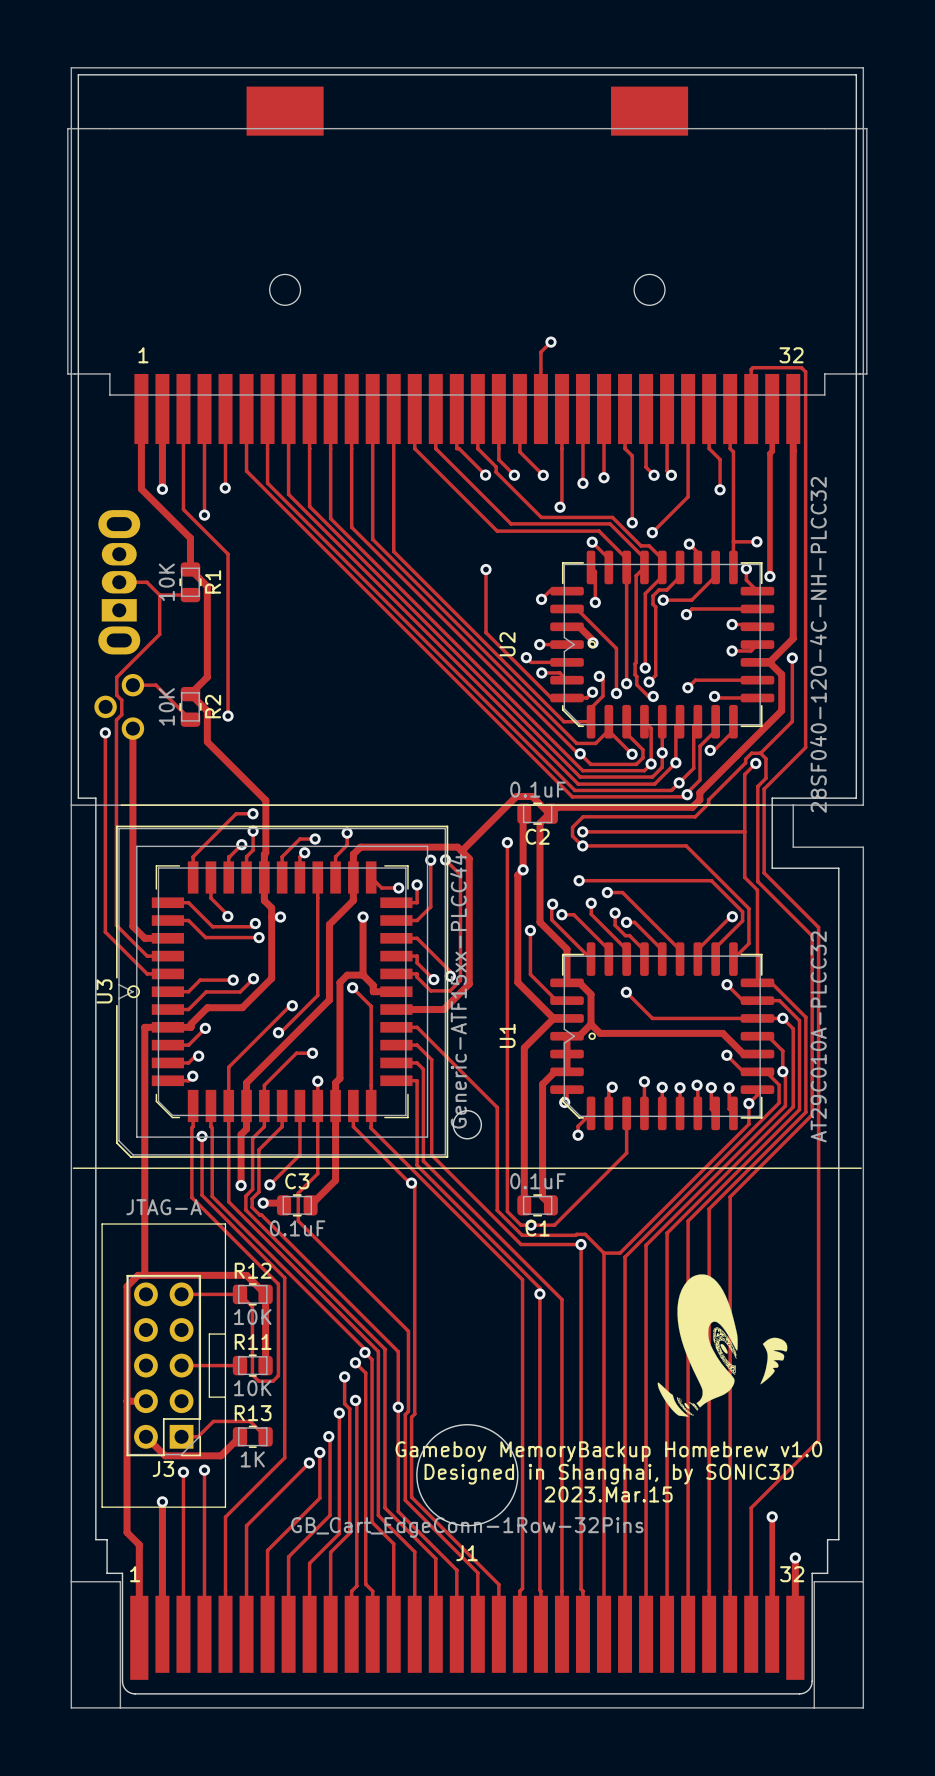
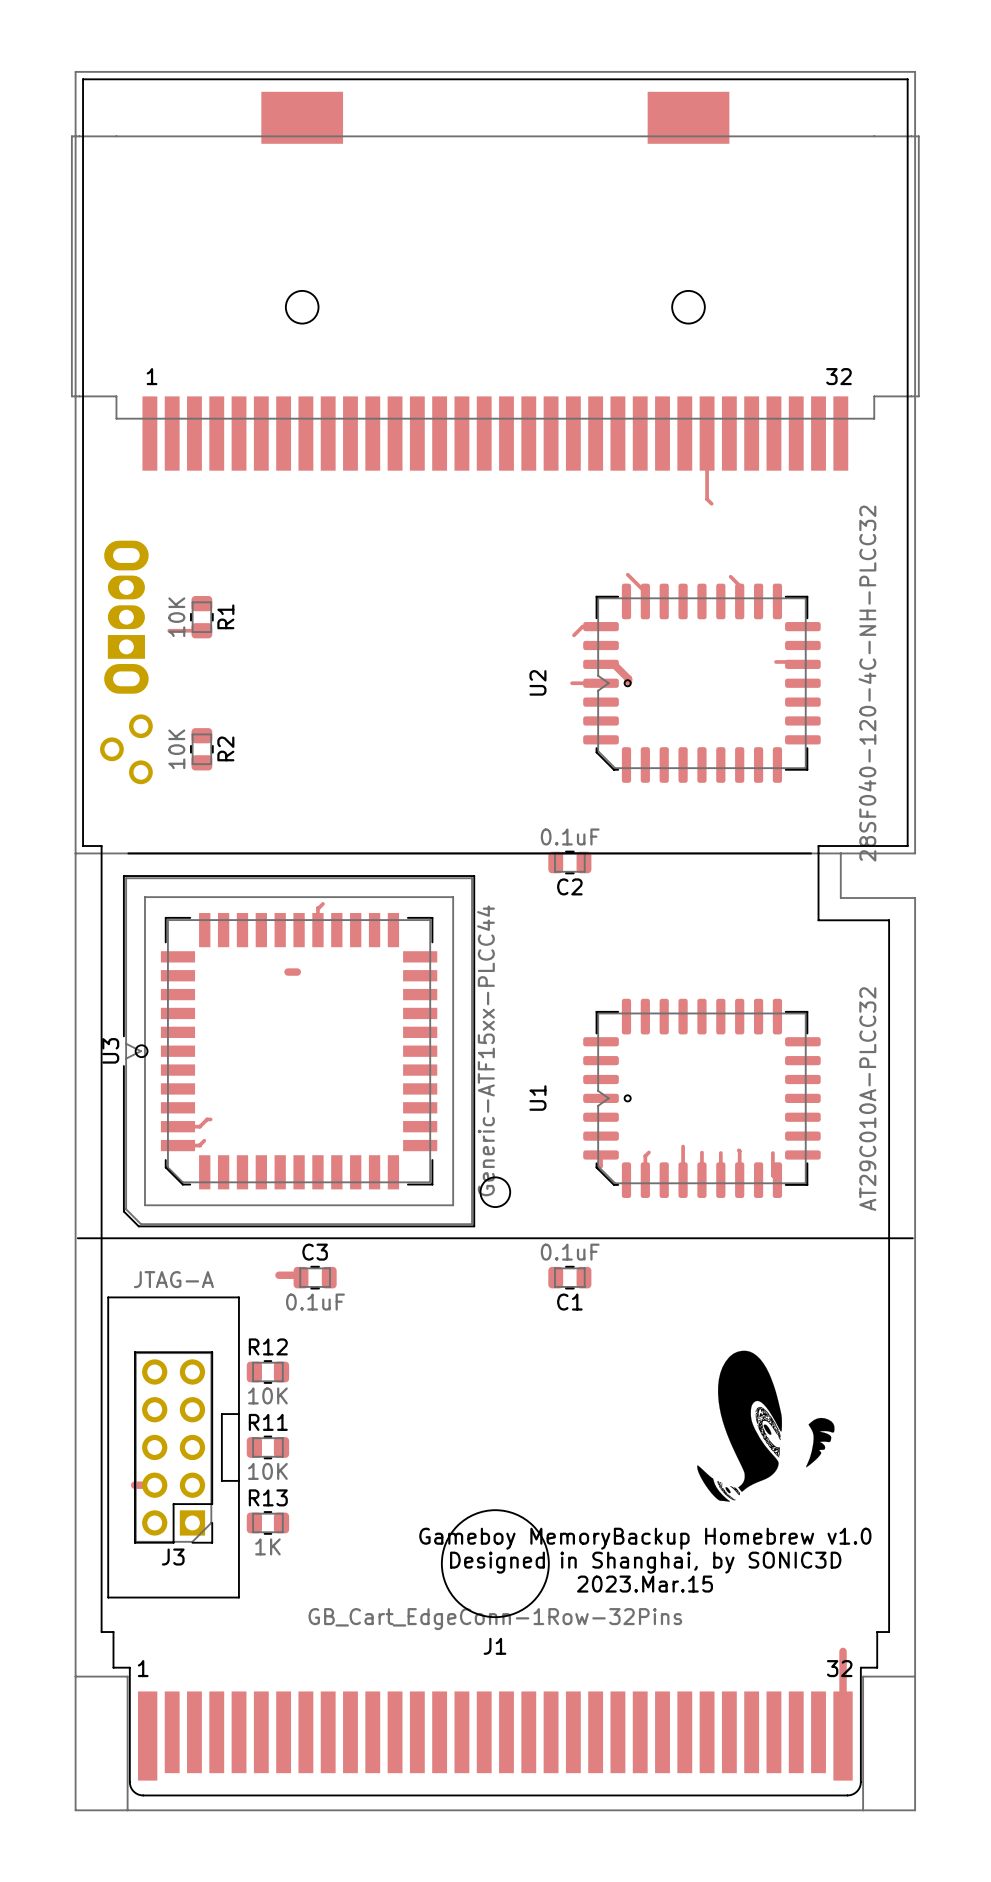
track: (550, 342) (540, 352) (540, 409) -> none
via: (550, 342) -> none
track: (141, 409) (141, 489) (190, 538) (190, 569) (207, 586) (207, 677) (190, 694) (207, 710) (207, 741) (265, 800) (264, 900) (271, 907) (271, 978) (242, 1007) (207, 1007) (191, 1024) (191, 1027) (144, 1027) (144, 1275) -> none
track: (162, 409) (162, 489) -> none
track: (183, 409) (183, 509) (228, 554) (228, 716) -> none
track: (204, 409) (204, 515) -> none
track: (225, 409) (225, 488) -> none
track: (246, 409) (246, 471) (572, 796) (683, 796) (700, 780) (700, 746) (715, 730) (715, 721) -> none
track: (267, 409) (267, 483) (574, 790) (671, 790) (693, 768) (693, 725) (697, 721) -> none
track: (288, 409) (288, 494) (578, 784) (654, 784) (675, 762) (675, 725) (680, 721) -> none
track: (309, 409) (309, 506) (580, 777) (652, 777) (662, 767) (662, 721) -> none
track: (330, 409) (330, 518) (582, 770) (644, 770) (651, 763) (651, 728) (644, 721) -> none
track: (351, 409) (351, 527) (590, 764) (636, 764) (642, 757) (642, 749) (626, 733) (626, 721) -> none
track: (372, 409) (372, 539) (576, 743) (595, 743) (608, 730) (608, 721) -> none
track: (393, 409) (393, 551) (563, 721) (591, 721) (591, 708) (603, 696) (603, 680) (599, 676) -> none
track: (414, 409) (414, 448) (497, 531) (599, 531) (626, 558) (626, 683) -> none
track: (435, 409) (435, 448) (511, 523) (610, 523) (644, 558) (644, 567) (636, 575) (635, 674) (636, 684) (648, 696) (653, 696) -> none
track: (456, 409) (456, 448) (459, 448) (485, 475) -> none
track: (477, 409) (477, 448) (496, 466) (496, 472) (541, 517) (612, 517) (641, 545) (649, 545) (662, 558) (662, 576) (645, 593) (645, 668) -> none
track: (498, 409) (498, 459) (514, 475) -> none
track: (519, 409) (519, 451) (543, 475) -> none
track: (561, 409) (561, 505) (560, 507) -> none
track: (582, 409) (582, 483) -> none
track: (604, 409) (604, 477) -> none
track: (625, 409) (625, 448) (632, 455) (632, 522) -> none
track: (646, 409) (646, 467) (654, 475) -> none
track: (688, 409) (688, 496) (652, 532) -> none
track: (709, 409) (709, 448) (720, 459) (720, 489) -> none
track: (730, 409) (730, 448) (733, 451) (733, 567) -> none
track: (751, 409) (751, 369) (752, 367) (801, 367) (805, 371) (805, 747) (764, 789) (764, 872) (818, 927) (818, 1440) (751, 1507) (751, 1634) -> none
track: (772, 409) (772, 451) (769, 453) (769, 576) -> none
track: (793, 409) (793, 638) (769, 662) -> none
via: (485, 475) -> none
via: (514, 475) -> none
via: (543, 475) -> none
via: (654, 475) -> none
via: (671, 475) -> none
via: (604, 477) -> none
via: (582, 483) -> none
via: (225, 488) -> none
via: (162, 489) -> none
via: (720, 489) -> none
via: (560, 507) -> none
via: (204, 515) -> none
via: (632, 522) -> none
via: (652, 532) -> none
track: (733, 541) (756, 541) -> none
via: (756, 541) -> none
via: (592, 542) -> none
via: (689, 544) -> none
track: (591, 567) (595, 571) (595, 602) -> none
track: (680, 567) (680, 576) (666, 589) (658, 589) (653, 595) (653, 604) (655, 607) (655, 675) (649, 682) -> none
track: (715, 567) (715, 576) (691, 600) (663, 600) -> none
track: (746, 568) (746, 580) (757, 591) -> none
via: (746, 568) -> none
track: (485, 569) (485, 632) (551, 697) (586, 697) (592, 692) -> none
via: (485, 569) -> none
via: (769, 576) -> none
track: (119, 582) (146, 582) (159, 595) (159, 634) (116, 677) (116, 695) (121, 700) (121, 714) (116, 720) (116, 925) (147, 956) (167, 956) -> none
via: (541, 599) -> none
via: (663, 600) -> none
via: (595, 602) -> none
track: (567, 608) (576, 608) (616, 648) (616, 693) -> none
track: (757, 608) (692, 608) (686, 614) -> none
via: (686, 614) -> none
via: (732, 624) -> none
via: (593, 642) -> none
via: (539, 644) -> none
track: (757, 644) (751, 650) (732, 650) -> none
via: (732, 650) -> none
track: (526, 657) (531, 662) (567, 662) -> none
via: (526, 657) -> none
track: (792, 658) (792, 721) (760, 753) -> none
via: (792, 658) -> none
track: (769, 662) (781, 674) (781, 710) (699, 792) (699, 799) (692, 807) (557, 807) (549, 813) -> none
via: (645, 668) -> none
track: (541, 672) (559, 672) (567, 680) -> none
via: (541, 672) -> none
via: (599, 676) -> none
track: (757, 680) (695, 680) (687, 687) -> none
via: (649, 682) -> none
via: (626, 683) -> none
track: (132, 685) (155, 685) (190, 719) -> none
via: (687, 687) -> none
via: (592, 692) -> none
via: (616, 693) -> none
via: (653, 696) -> none
track: (714, 696) (757, 697) -> none
via: (714, 696) -> none
via: (228, 716) -> none
track: (733, 721) (733, 731) (714, 750) (710, 750) -> none
track: (132, 728) (132, 926) (144, 938) (167, 938) -> none
track: (608, 730) (632, 754) -> none
track: (105, 732) (105, 932) (147, 973) (167, 973) -> none
via: (105, 732) -> none
via: (710, 750) -> none
via: (662, 752) -> none
via: (580, 753) -> none
track: (760, 753) (765, 758) (765, 778) (757, 786) (757, 881) (812, 935) (812, 1114) (730, 1196) (730, 1634) -> none
track: (760, 753) (751, 753) (745, 759) (745, 762) (708, 799) (708, 803) (695, 816) (583, 816) (572, 827) (572, 836) (582, 845) (686, 845) (748, 908) (748, 943) (733, 959) -> none
via: (632, 754) -> none
via: (675, 762) -> none
via: (651, 763) -> none
track: (755, 763) (744, 774) (744, 877) (757, 890) (757, 982) (771, 982) (805, 1017) (805, 1112) (709, 1208) (709, 1634) -> none
via: (755, 763) -> none
via: (679, 782) -> none
via: (687, 794) -> none
track: (252, 813) (236, 813) (193, 856) (193, 877) -> none
via: (252, 813) -> none
track: (524, 813) (523, 869) (517, 875) (517, 982) (553, 1018) -> none
track: (549, 813) (532, 796) (516, 796) (461, 851) -> none
track: (549, 813) (539, 823) (539, 922) (567, 949) (567, 982) (579, 982) (591, 994) (591, 1024) -> none
track: (253, 831) (253, 850) (246, 856) (246, 877) -> none
via: (253, 831) -> none
track: (582, 831) (744, 831) -> none
via: (582, 831) -> none
track: (347, 833) (347, 845) (335, 856) (335, 877) -> none
via: (347, 833) -> none
track: (315, 839) (299, 839) (282, 856) (282, 877) -> none
via: (315, 839) -> none
track: (507, 842) (507, 1211) (520, 1225) (554, 1225) (626, 1153) (626, 1113) -> none
via: (507, 842) -> none
track: (241, 844) (228, 856) (228, 877) -> none
via: (241, 844) -> none
via: (582, 845) -> none
via: (304, 852) -> none
track: (445, 859) (460, 874) (460, 980) (450, 990) (430, 990) (417, 977) (417, 973) (396, 973) -> none
via: (445, 859) -> none
track: (430, 860) (430, 906) (417, 920) (396, 920) -> none
via: (430, 860) -> none
via: (523, 869) -> none
track: (210, 877) (210, 898) (227, 916) -> none
track: (317, 877) (317, 995) (278, 1032) -> none
track: (371, 877) (381, 888) (398, 888) -> none
track: (579, 880) (711, 880) (742, 911) (742, 920) (715, 947) (715, 959) -> none
via: (579, 880) -> none
track: (417, 884) (417, 902) (396, 902) -> none
via: (417, 884) -> none
via: (398, 888) -> none
track: (607, 892) (622, 892) (680, 950) (680, 959) -> none
via: (607, 892) -> none
track: (167, 902) (188, 902) (212, 926) (252, 926) (255, 923) -> none
track: (591, 903) (591, 914) (626, 949) (626, 959) -> none
via: (591, 903) -> none
track: (552, 904) (551, 919) (591, 959) -> none
via: (552, 904) -> none
track: (615, 913) (615, 925) (625, 935) (629, 935) (644, 950) (644, 959) -> none
via: (615, 913) -> none
track: (561, 914) (573, 914) (608, 949) (608, 959) -> none
via: (561, 914) -> none
via: (227, 916) -> none
track: (732, 916) (697, 949) (697, 959) -> none
via: (732, 916) -> none
via: (280, 917) -> none
track: (363, 917) (363, 975) -> none
via: (363, 917) -> none
track: (167, 920) (188, 920) (205, 937) (259, 937) -> none
track: (626, 922) (634, 922) (662, 949) (662, 959) -> none
via: (626, 922) -> none
via: (255, 923) -> none
track: (530, 930) (530, 974) (556, 1000) (567, 1000) -> none
via: (530, 930) -> none
via: (259, 937) -> none
track: (396, 938) (417, 938) (450, 971) (450, 976) -> none
track: (396, 956) (417, 956) (417, 962) (433, 979) -> none
track: (363, 975) (347, 975) (339, 982) (339, 1078) (335, 1082) (335, 1180) (310, 1205) -> none
track: (363, 975) (373, 985) (373, 991) (396, 991) -> none
via: (450, 976) -> none
track: (253, 978) (240, 991) (206, 991) (188, 1009) (167, 1009) -> none
via: (253, 978) -> none
via: (433, 979) -> none
track: (233, 980) (200, 980) (188, 991) (167, 991) -> none
via: (233, 980) -> none
track: (727, 984) (742, 1000) (779, 1000) (799, 1020) (799, 1109) (688, 1221) (688, 1634) -> none
via: (727, 984) -> none
track: (352, 987) (371, 1006) (371, 1128) (522, 1279) (522, 1588) (519, 1591) (519, 1634) -> none
via: (352, 987) -> none
track: (626, 992) (652, 1018) (782, 1018) -> none
via: (626, 992) -> none
track: (292, 1005) (290, 1005) (228, 1067) (228, 1201) (378, 1351) (378, 1515) (414, 1551) (414, 1634) -> none
via: (292, 1005) -> none
track: (396, 1009) (443, 1009) (469, 984) (469, 858) (457, 847) (360, 847) (353, 854) (353, 900) (329, 924) (329, 999) (246, 1082) (246, 1129) (241, 1134) (241, 1185) -> none
track: (553, 1018) (524, 1047) (524, 1205) -> none
track: (782, 1018) (793, 1028) (793, 1107) (667, 1233) (667, 1634) -> none
via: (782, 1018) -> none
track: (591, 1024) (600, 1033) (722, 1033) (743, 1054) (757, 1054) -> none
track: (591, 1024) (579, 1036) (567, 1036) (567, 1071) (555, 1071) (542, 1084) (542, 1197) (550, 1205) -> none
track: (396, 1027) (417, 1027) (497, 1107) (497, 1210) (522, 1235) (585, 1234) (604, 1253) -> none
track: (205, 1028) (188, 1045) (167, 1045) -> none
via: (205, 1028) -> none
via: (278, 1032) -> none
track: (757, 1036) (768, 1036) (782, 1051) (785, 1105) (646, 1245) (646, 1634) -> none
track: (396, 1045) (417, 1045) (431, 1059) (431, 1155) (521, 1244) (581, 1244) (581, 1589) (582, 1591) (582, 1634) -> none
track: (312, 1053) (296, 1053) (264, 1085) (264, 1126) (252, 1138) (252, 1189) (245, 1196) (245, 1210) (384, 1349) (384, 1507) (435, 1558) (435, 1634) -> none
via: (312, 1053) -> none
track: (726, 1055) (743, 1071) (766, 1071) (779, 1084) (779, 1103) (625, 1257) (625, 1634) -> none
via: (726, 1055) -> none
via: (198, 1056) -> none
track: (396, 1062) (417, 1062) (423, 1069) (423, 1160) (561, 1299) (561, 1634) -> none
via: (782, 1071) -> none
via: (192, 1076) -> none
track: (396, 1080) (417, 1080) (417, 1165) (539, 1288) (540, 1634) -> none
track: (317, 1081) (317, 1173) (298, 1193) (298, 1221) (408, 1331) (408, 1411) (405, 1414) (405, 1500) (477, 1572) (477, 1634) -> none
via: (317, 1081) -> none
via: (644, 1081) -> none
via: (697, 1085) -> none
via: (612, 1087) -> none
via: (662, 1087) -> none
via: (680, 1087) -> none
track: (711, 1087) (711, 1109) (715, 1113) -> none
via: (711, 1087) -> none
via: (729, 1087) -> none
track: (757, 1089) (757, 1094) (748, 1103) (748, 1124) (620, 1253) (604, 1253) -> none
via: (564, 1102) -> none
via: (748, 1103) -> none
track: (193, 1105) (191, 1197) (278, 1284) (278, 1375) (273, 1381) (258, 1381) (252, 1374) (252, 1306) (239, 1294) (181, 1294) -> none
track: (210, 1105) (212, 1196) (364, 1349) (364, 1352) (372, 1359) (372, 1522) (393, 1543) (393, 1634) -> none
track: (282, 1105) (282, 1126) (258, 1149) (258, 1191) (252, 1198) (252, 1207) (398, 1351) (398, 1511) (456, 1570) (456, 1634) -> none
track: (299, 1105) (299, 1154) (269, 1184) -> none
track: (353, 1105) (353, 1126) (414, 1186) (414, 1414) (411, 1417) (411, 1497) (498, 1584) (498, 1634) -> none
track: (591, 1113) (578, 1126) (578, 1135) -> none
via: (578, 1135) -> none
track: (202, 1136) (202, 1195) (284, 1277) (284, 1457) (225, 1517) (225, 1634) -> none
via: (202, 1136) -> none
via: (411, 1183) -> none
via: (269, 1184) -> none
via: (241, 1185) -> none
via: (263, 1203) -> none
via: (531, 1225) -> none
via: (581, 1244) -> none
track: (604, 1253) (604, 1634) -> none
via: (539, 1294) -> none
via: (364, 1352) -> none
track: (355, 1362) (365, 1373) (365, 1584) (372, 1591) (372, 1634) -> none
via: (355, 1362) -> none
track: (181, 1365) (239, 1365) -> none
track: (265, 1365) (265, 1294) (246, 1275) (138, 1275) (127, 1286) (127, 1532) (139, 1544) (139, 1637) -> none
track: (344, 1376) (344, 1403) (349, 1408) (349, 1533) (330, 1552) (330, 1634) -> none
via: (344, 1376) -> none
track: (355, 1400) (356, 1586) (351, 1591) (351, 1634) -> none
via: (355, 1400) -> none
via: (398, 1407) -> none
track: (339, 1413) (339, 1533) (309, 1563) (309, 1634) -> none
via: (339, 1413) -> none
track: (145, 1436) (165, 1455) (220, 1455) (239, 1436) -> none
track: (181, 1436) (198, 1436) (213, 1421) (250, 1421) (265, 1436) -> none
track: (328, 1436) (330, 1515) (288, 1556) (288, 1634) -> none
via: (328, 1436) -> none
track: (319, 1452) (319, 1498) (267, 1550) (267, 1634) -> none
via: (319, 1452) -> none
track: (309, 1462) (246, 1525) (246, 1634) -> none
via: (309, 1462) -> none
track: (204, 1470) (204, 1634) -> none
via: (204, 1470) -> none
track: (183, 1472) (183, 1634) -> none
via: (183, 1472) -> none
track: (162, 1501) (162, 1634) -> none
via: (162, 1501) -> none
track: (772, 1516) (772, 1634) -> none
via: (772, 1516) -> none
via: (795, 1557) -> none

